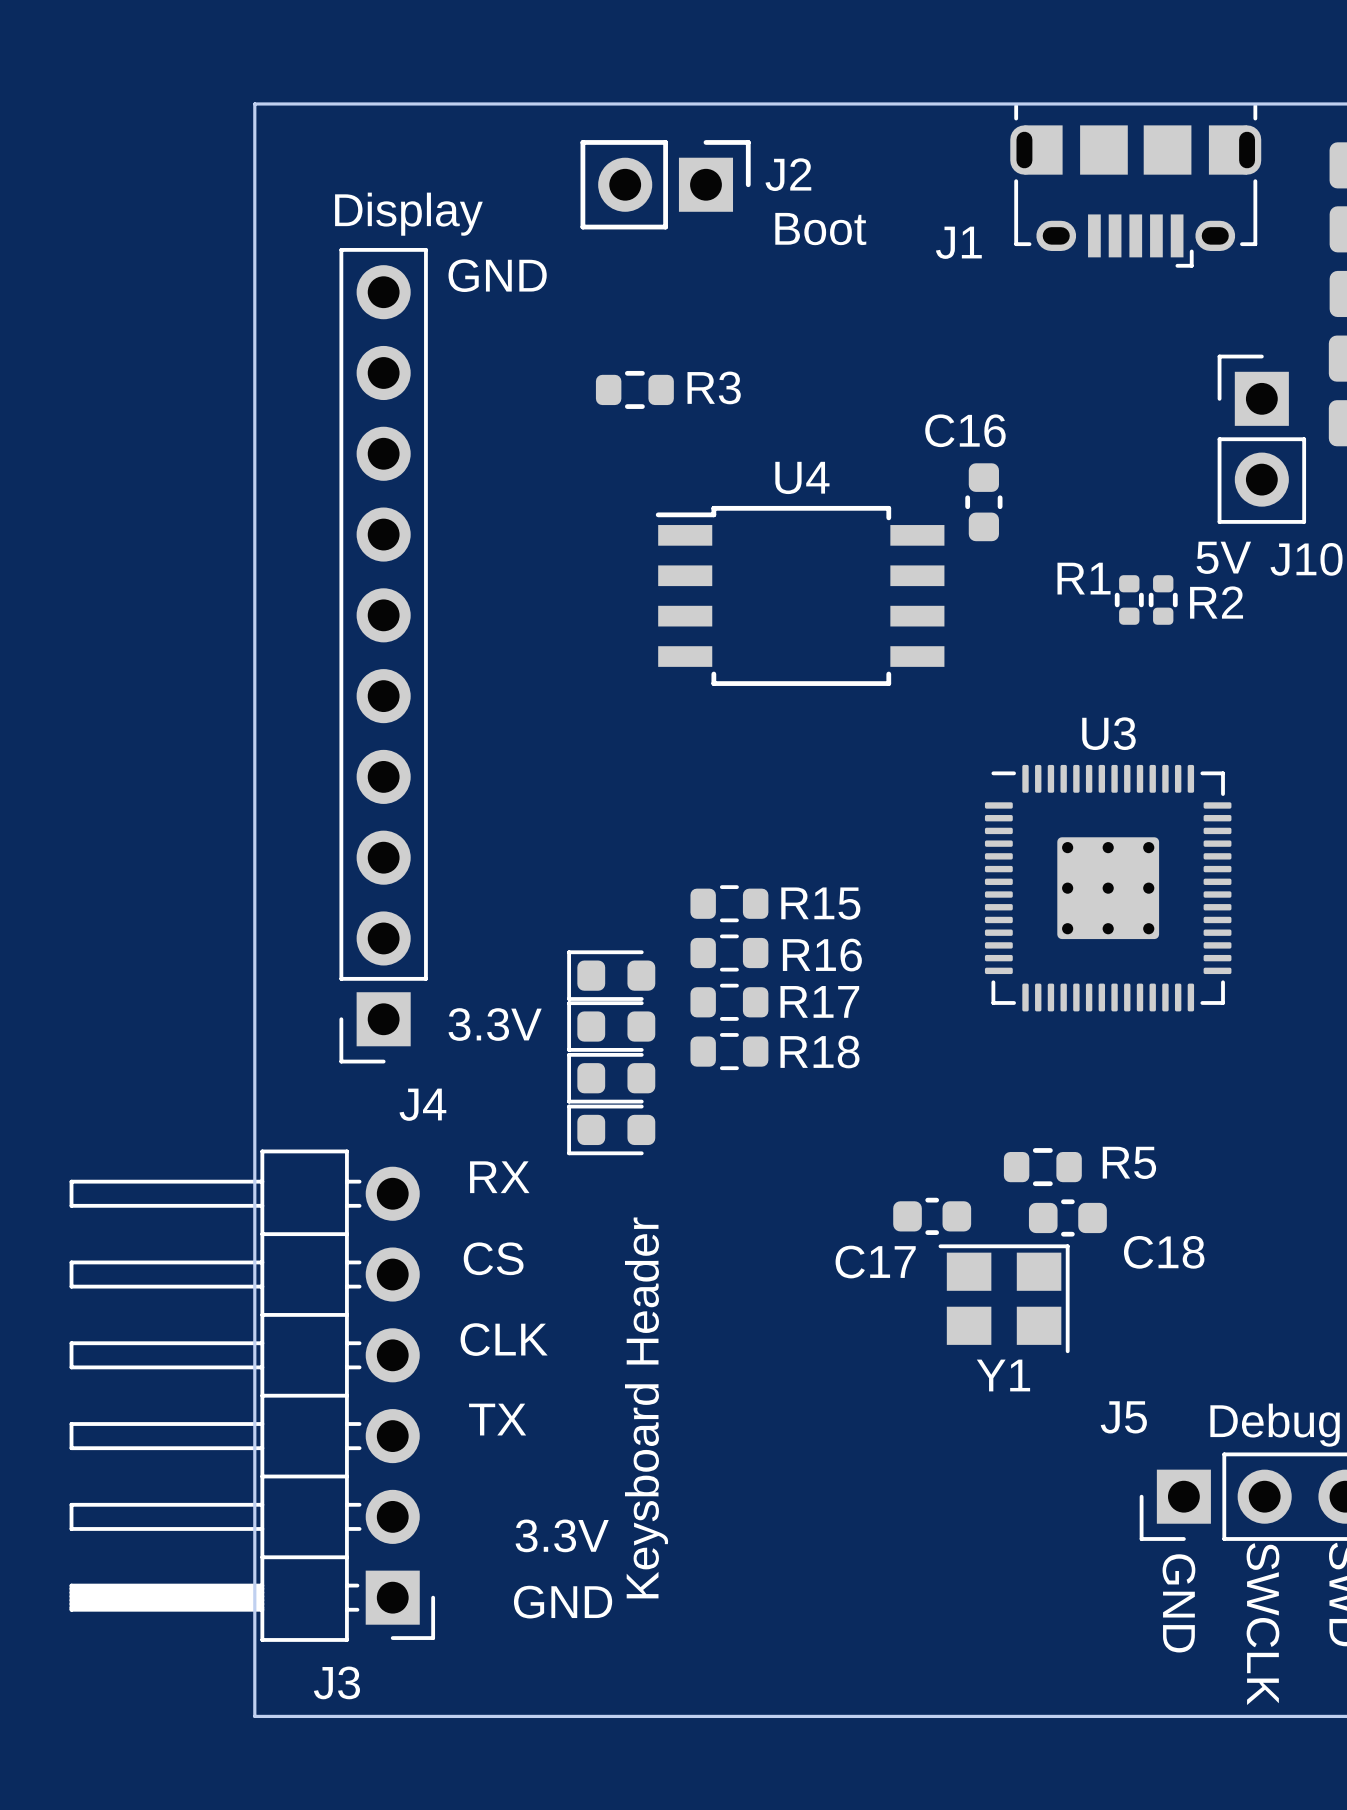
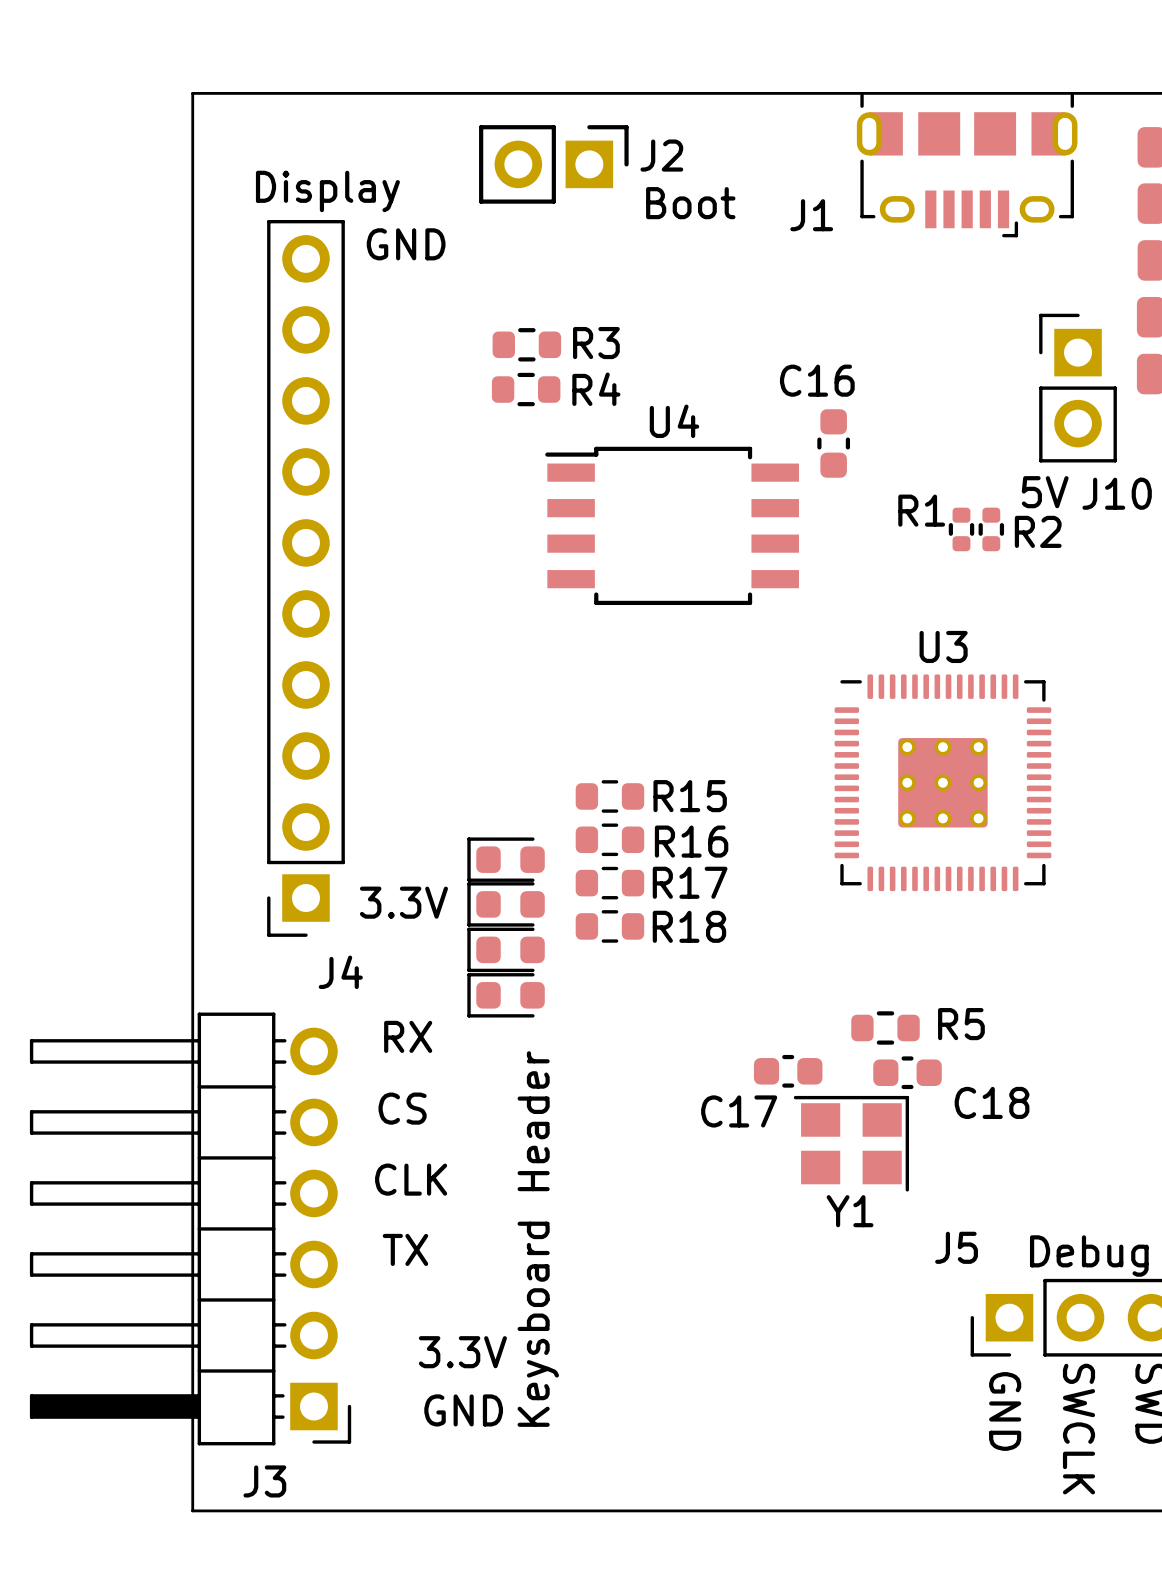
R4: none -> (526, 389)

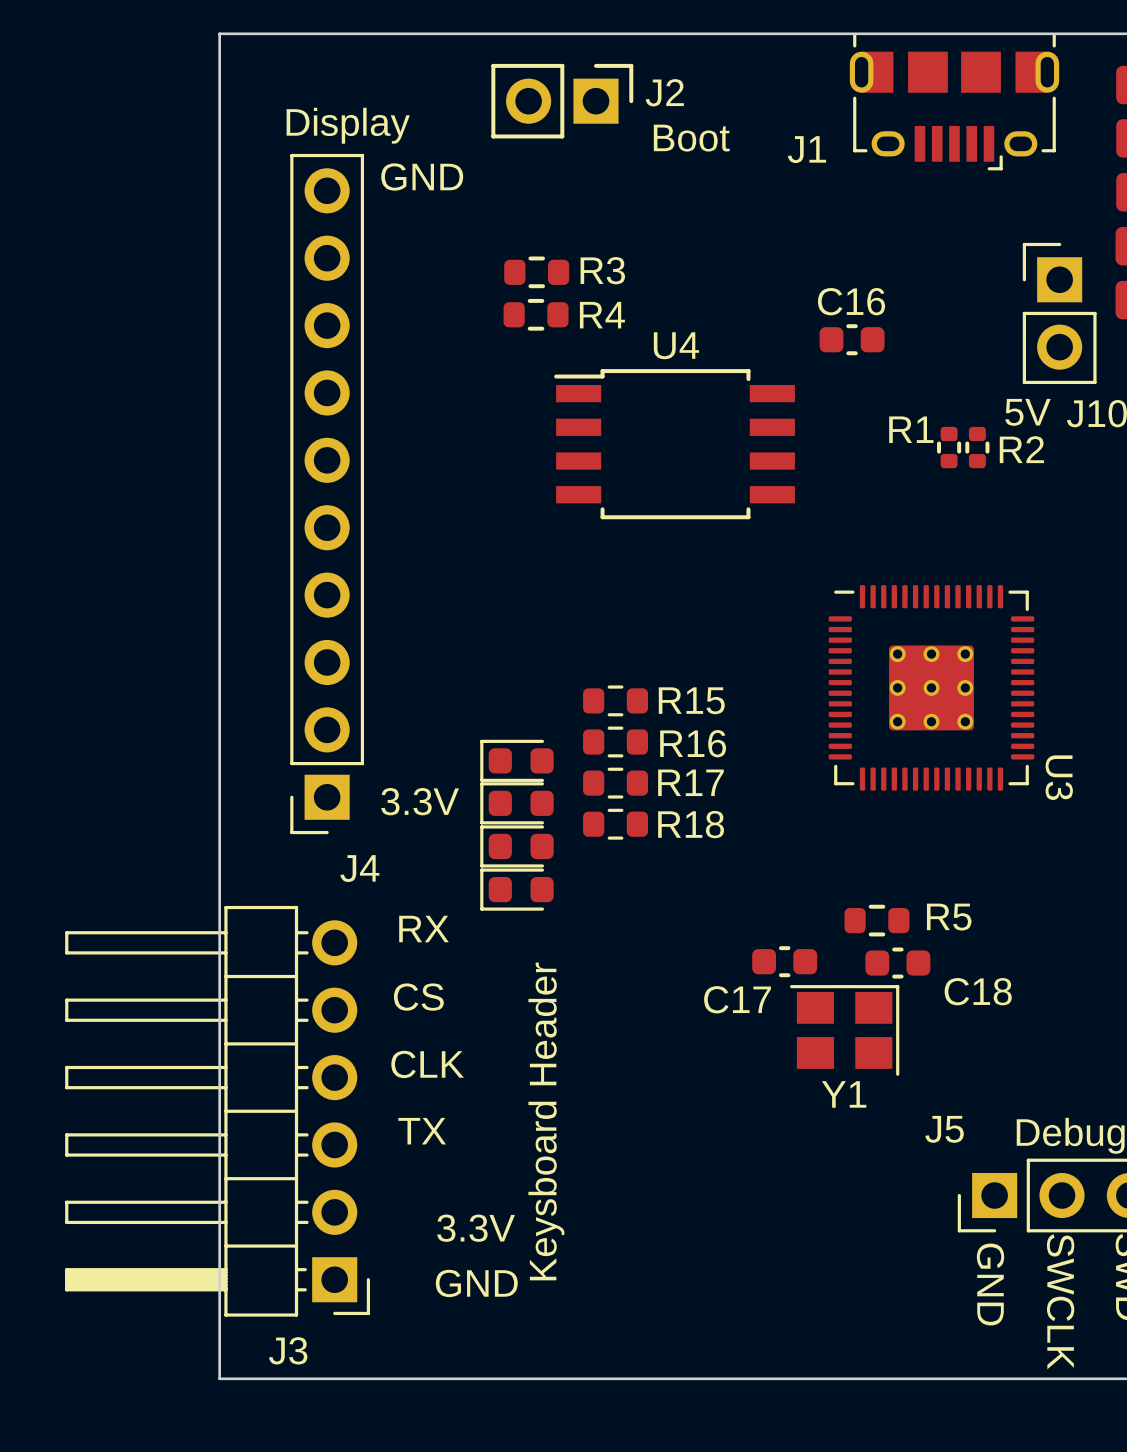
C16 rotation: 0° (833, 443) -> 90° clockwise (852, 339)
U3 name rotation: 0° (943, 646) -> 90° clockwise (1059, 777)
U3 name position: U3 (943, 646) -> U3 (1059, 777)

